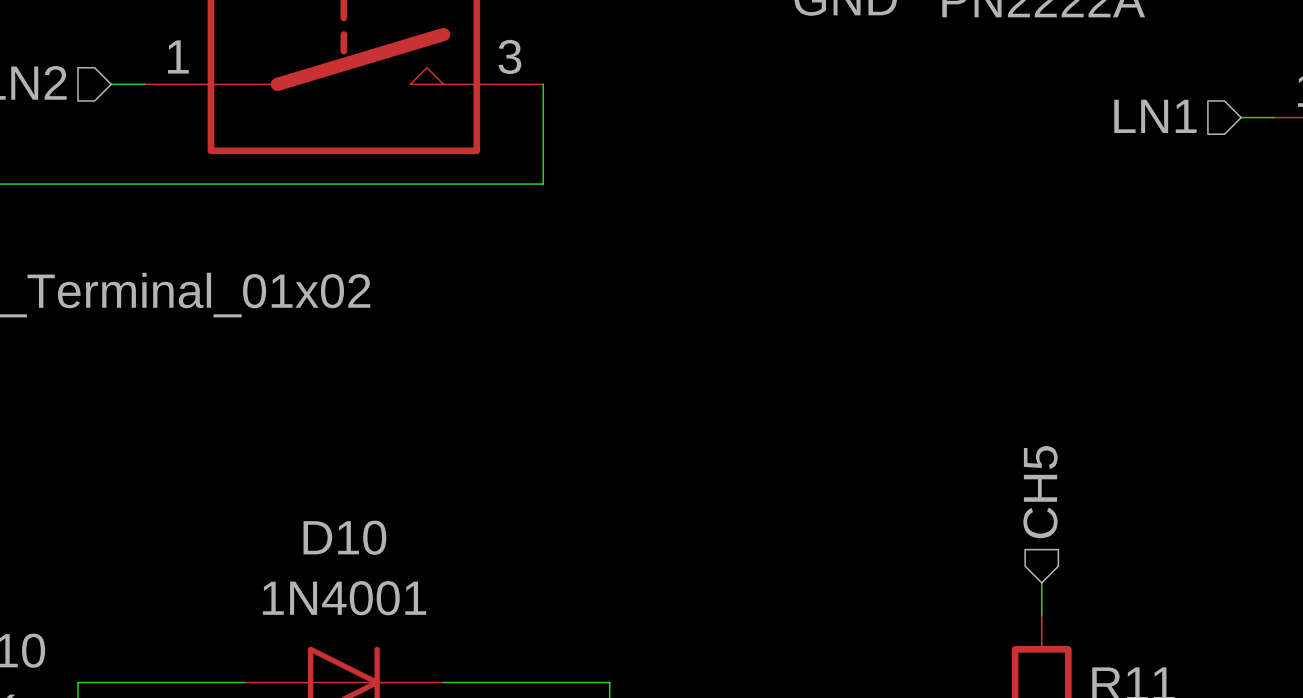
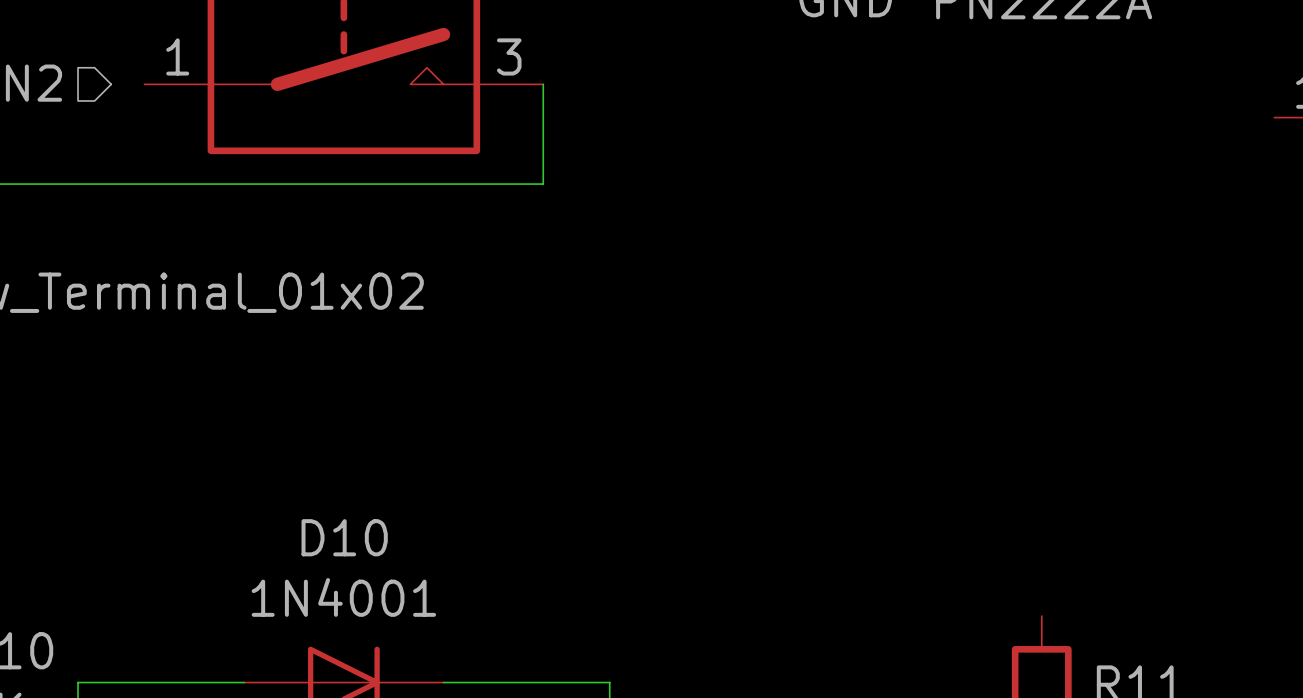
wire: (111, 84) (144, 84) -> none
hierarchical label: LN1 (1155, 116) -> none
wire: (1241, 117) (1274, 117) -> none
hierarchical label: CH5 (1040, 492) -> none
wire: (1041, 582) (1041, 616) -> none

